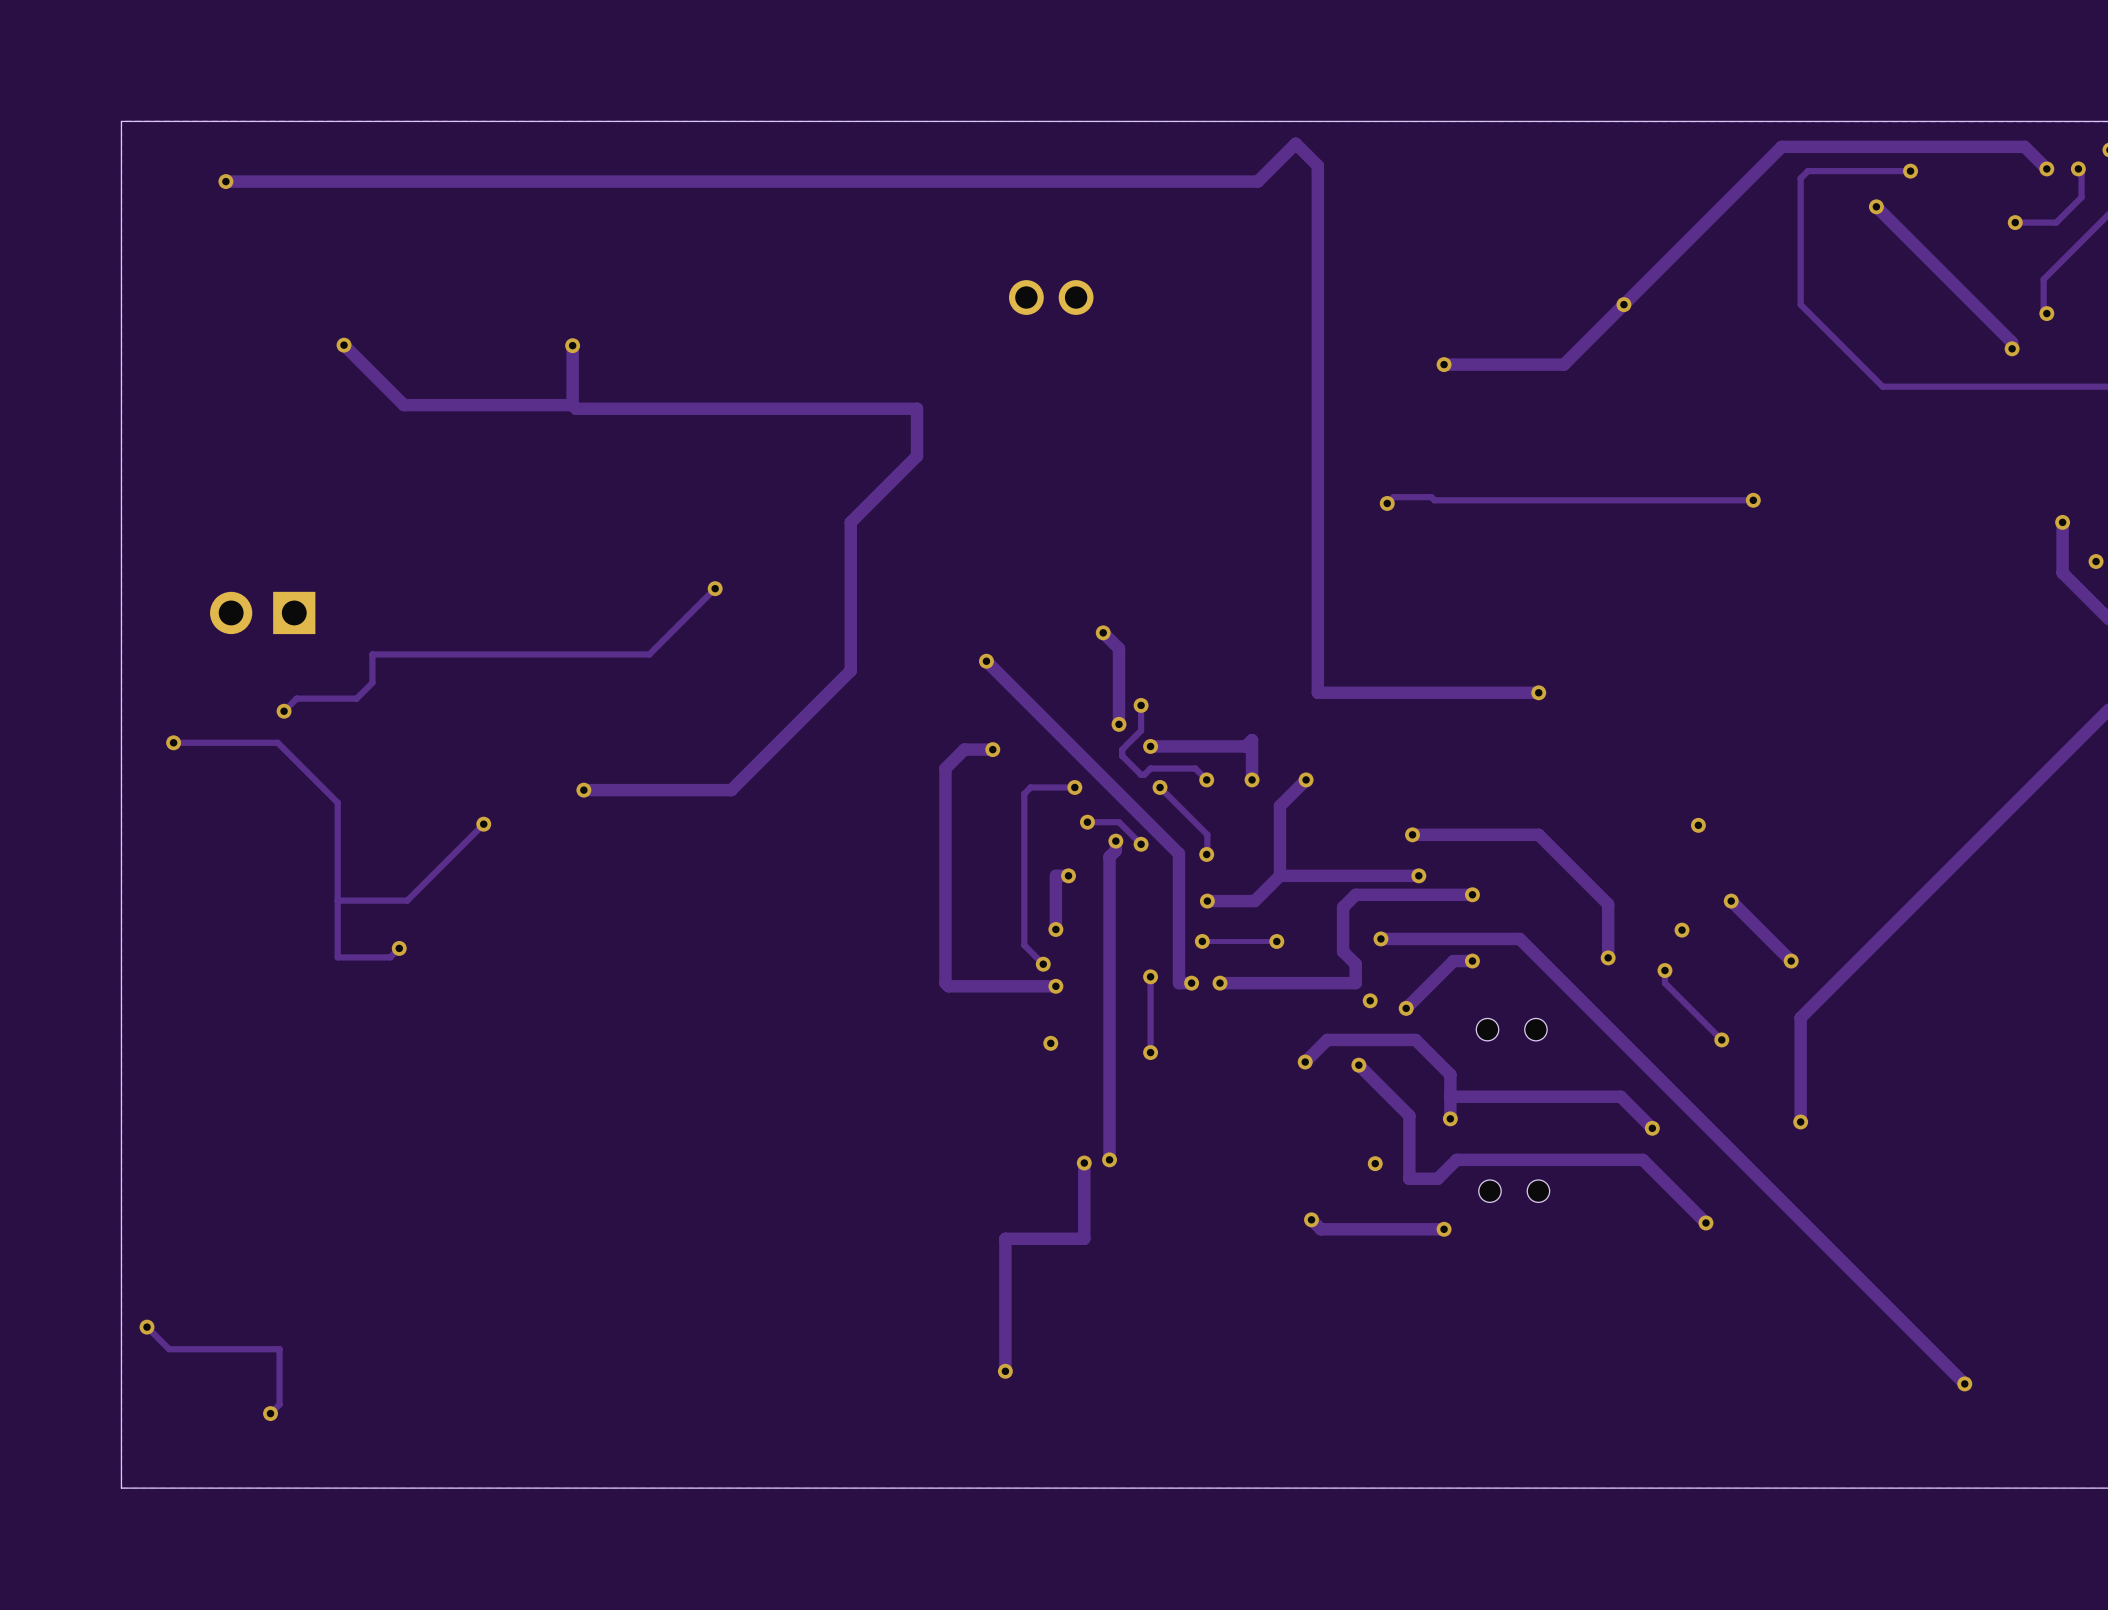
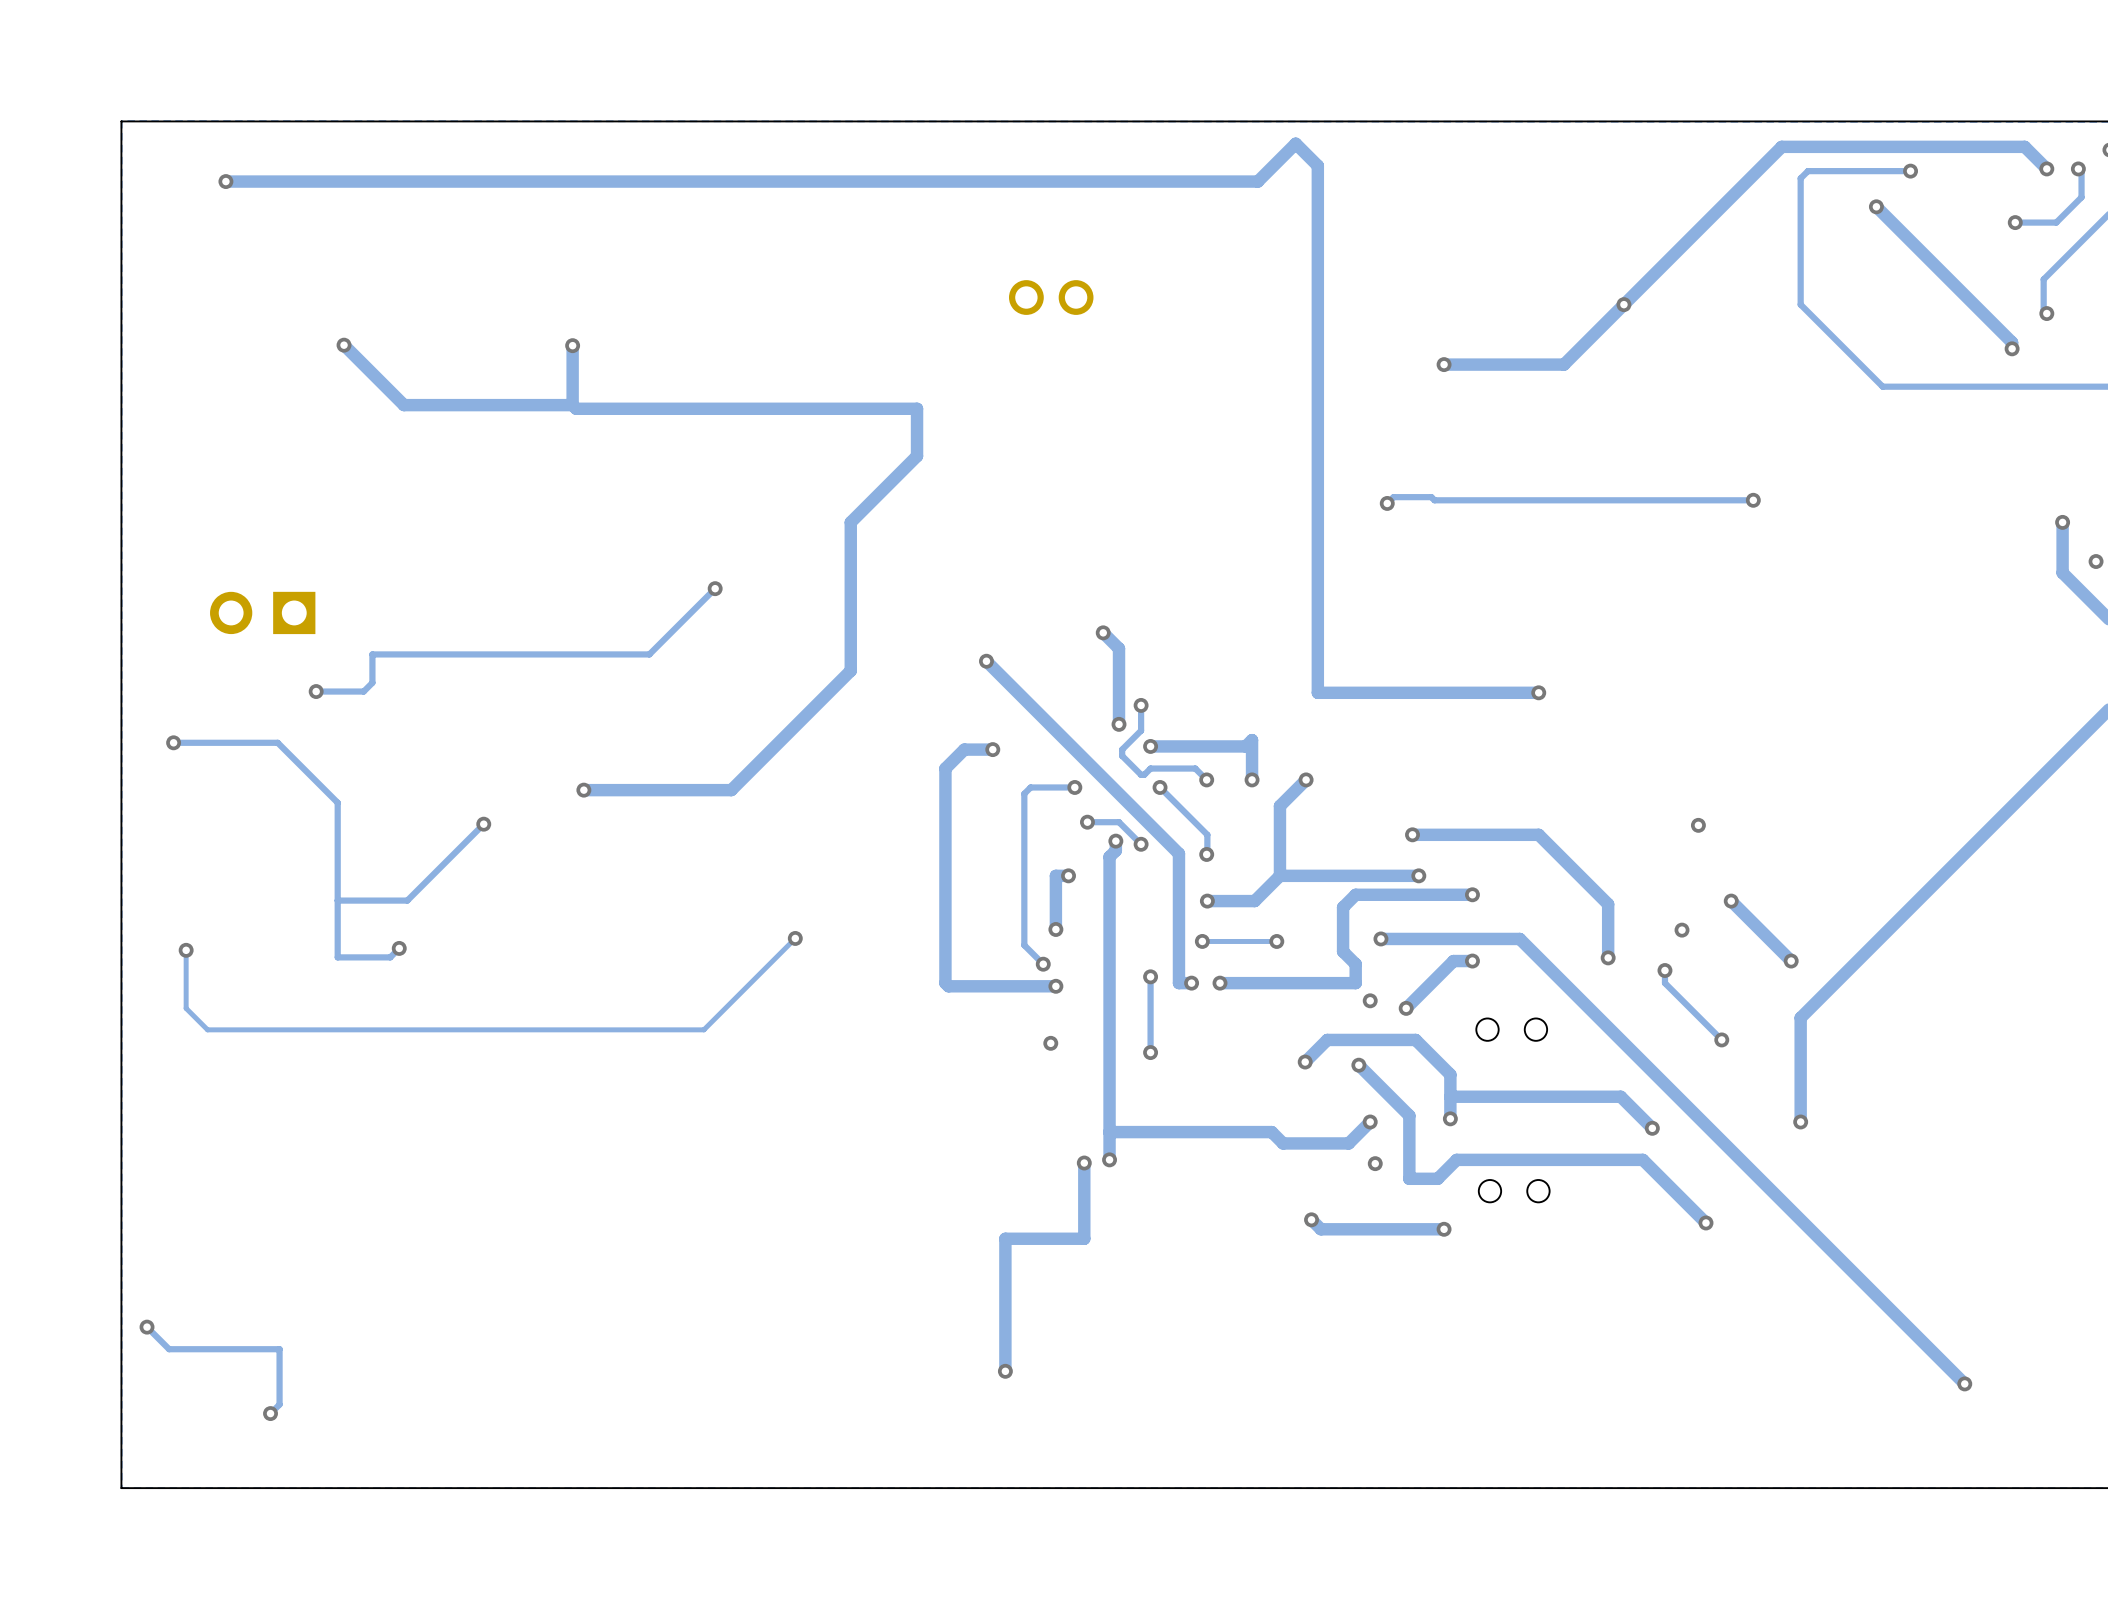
track: (363, 691) (356, 698) (296, 698) (287, 708) -> (363, 691) (316, 691)
via position: (284, 711) -> (316, 691)
track: none -> (795, 938) (703, 1029) (207, 1029) (186, 1008) (186, 950)
via: none -> (795, 938)
via: none -> (186, 950)
track: none -> (1370, 1121) (1348, 1143) (1283, 1143) (1271, 1132) (1109, 1132)
via: none -> (1370, 1121)

